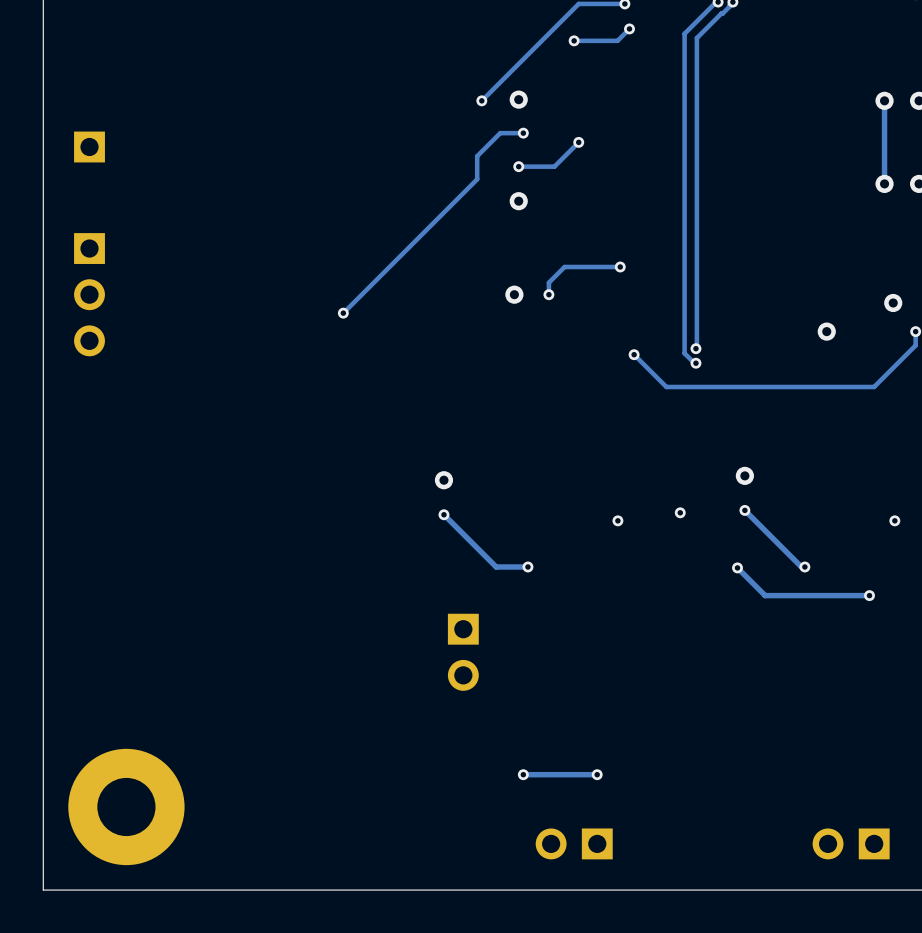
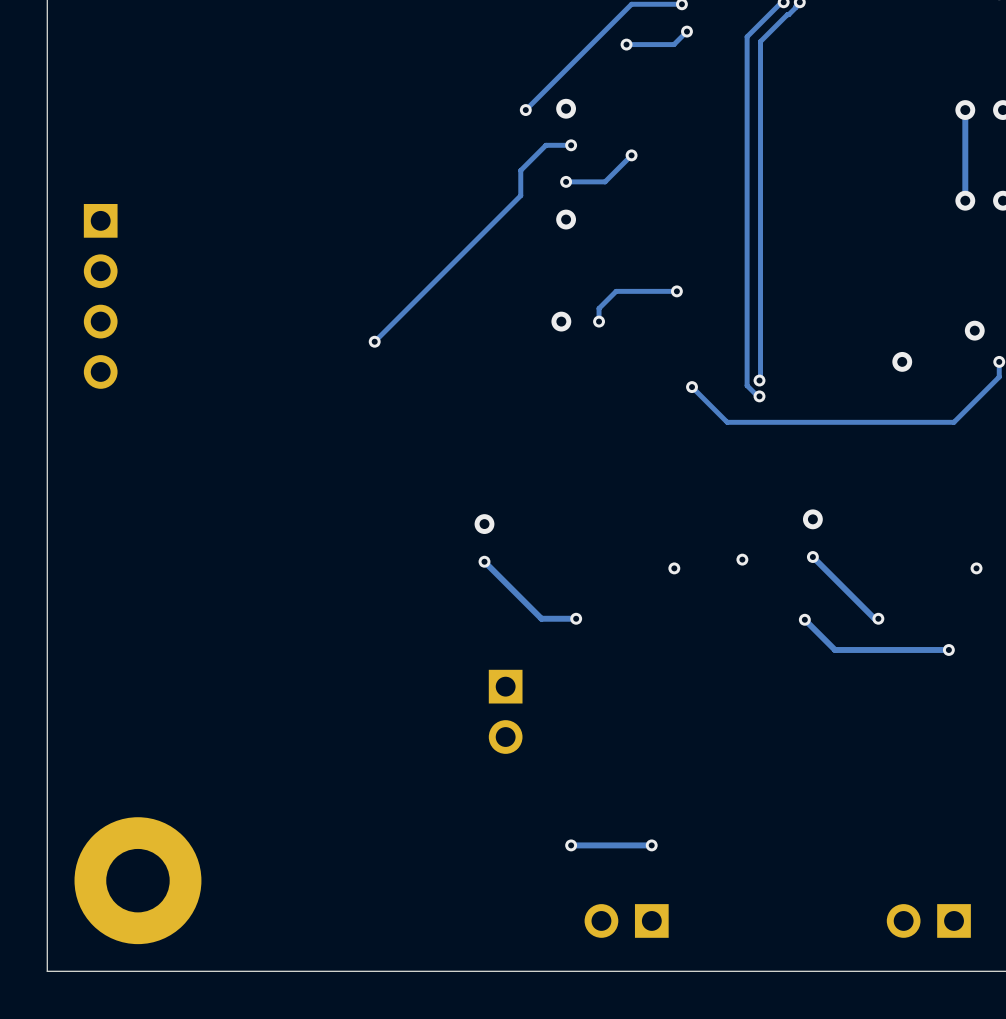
part: (89, 146) -> none
part: none -> (100, 296)
part: (89, 294) -> none

